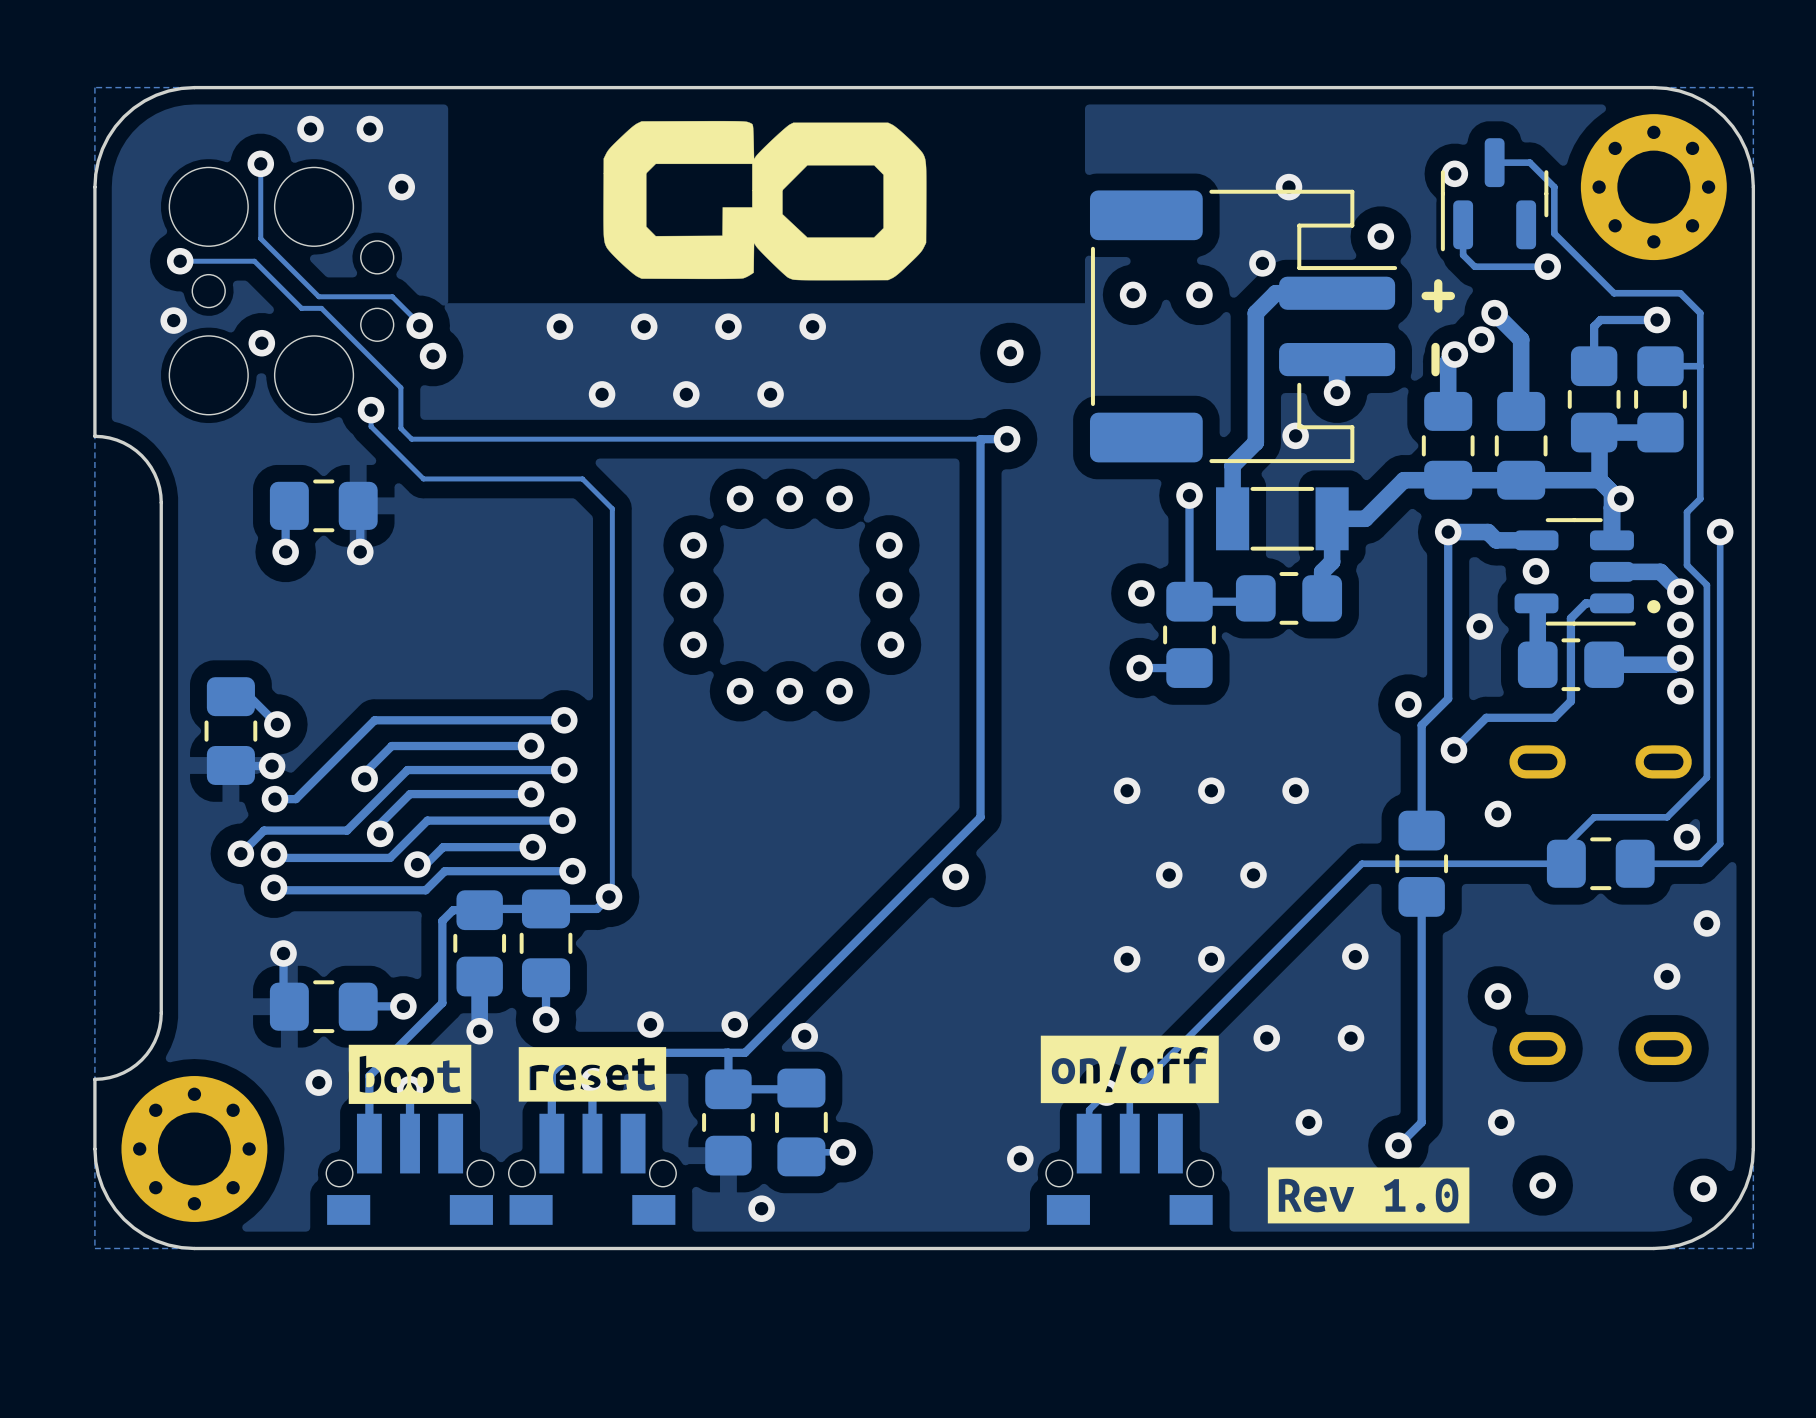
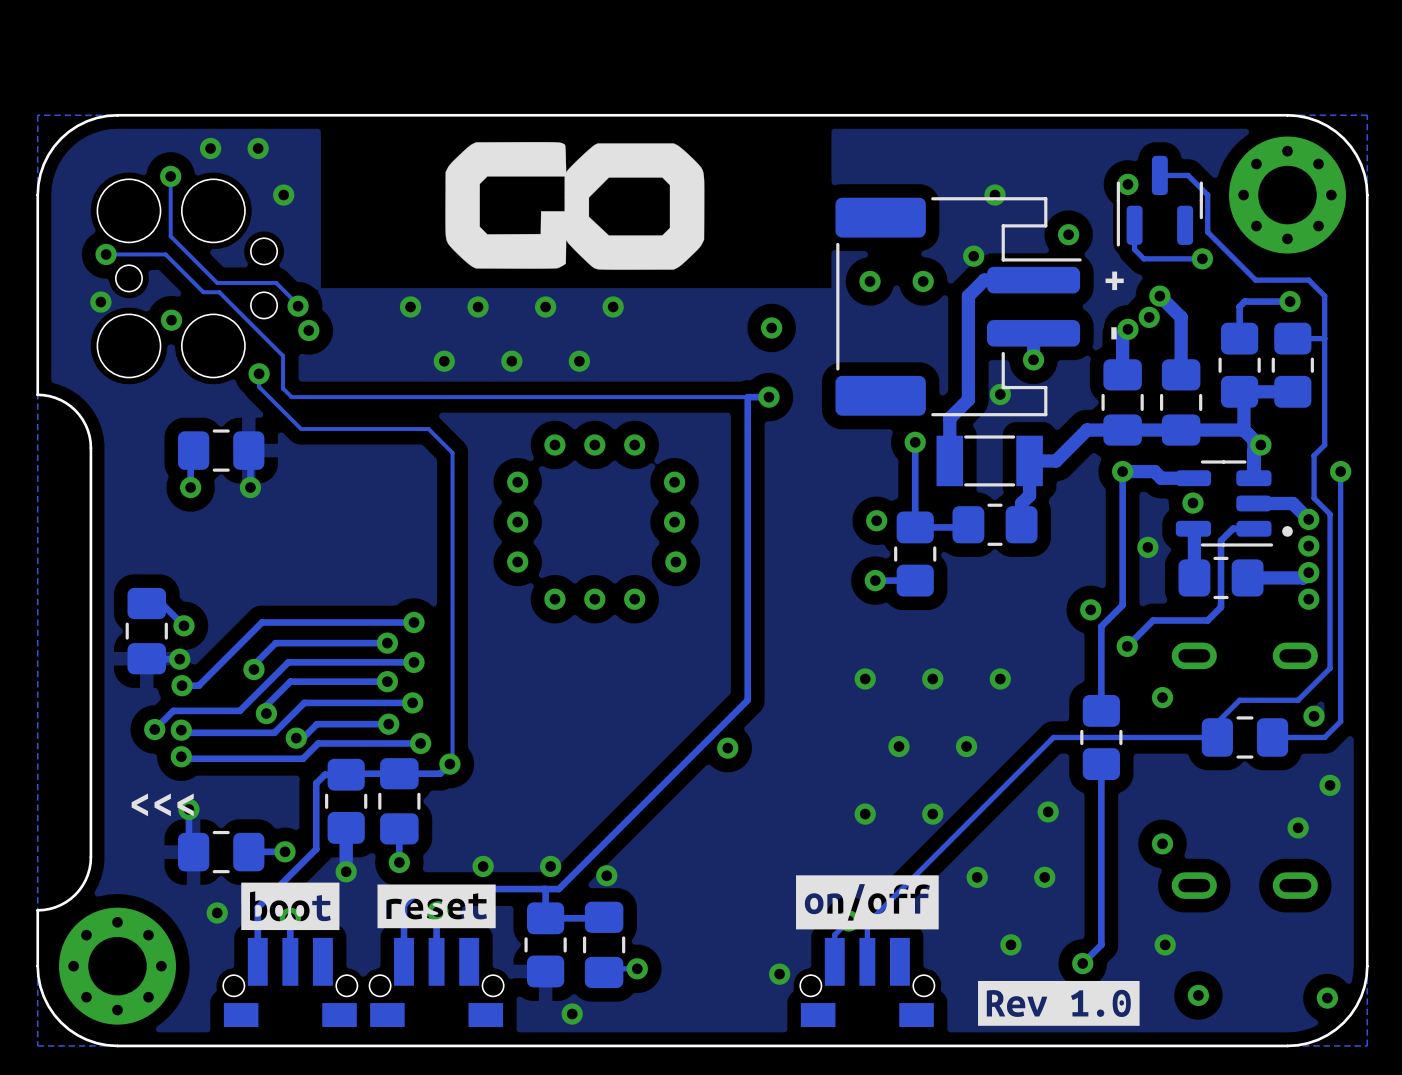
part: none -> (162, 804)

